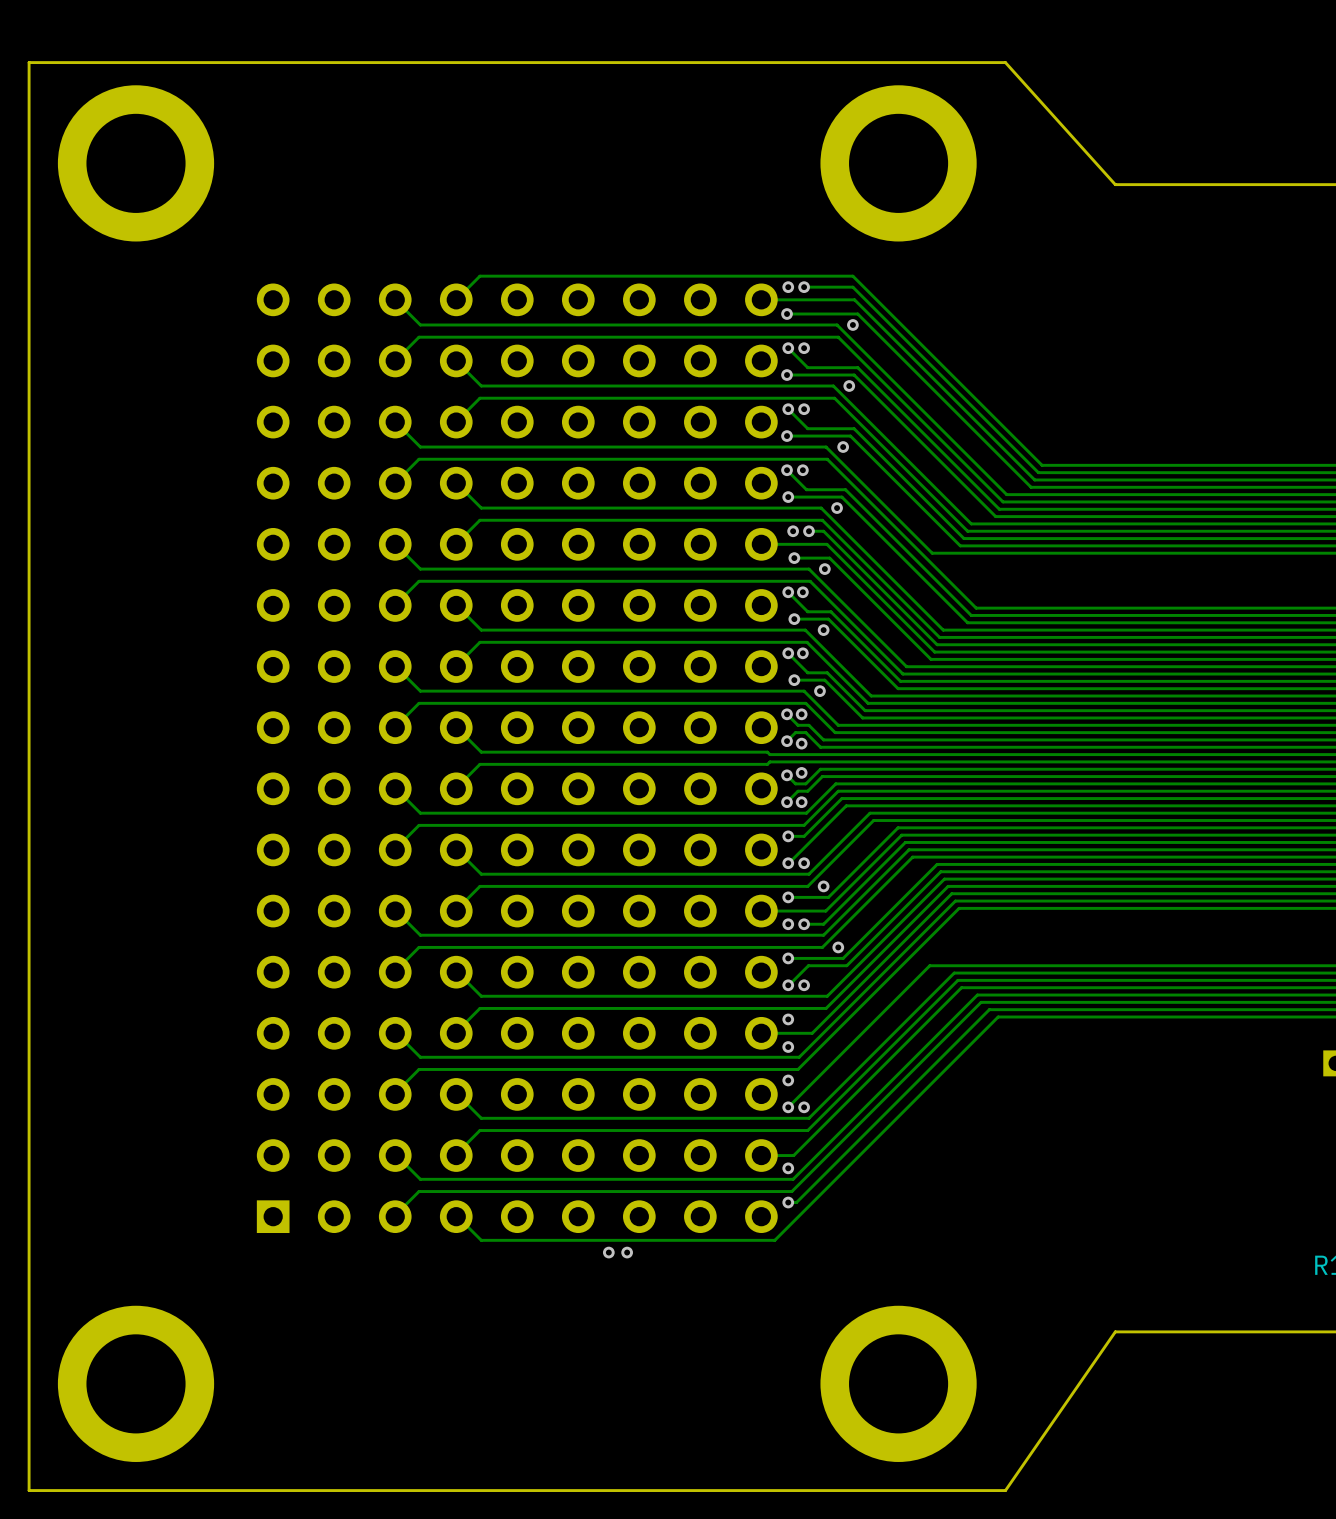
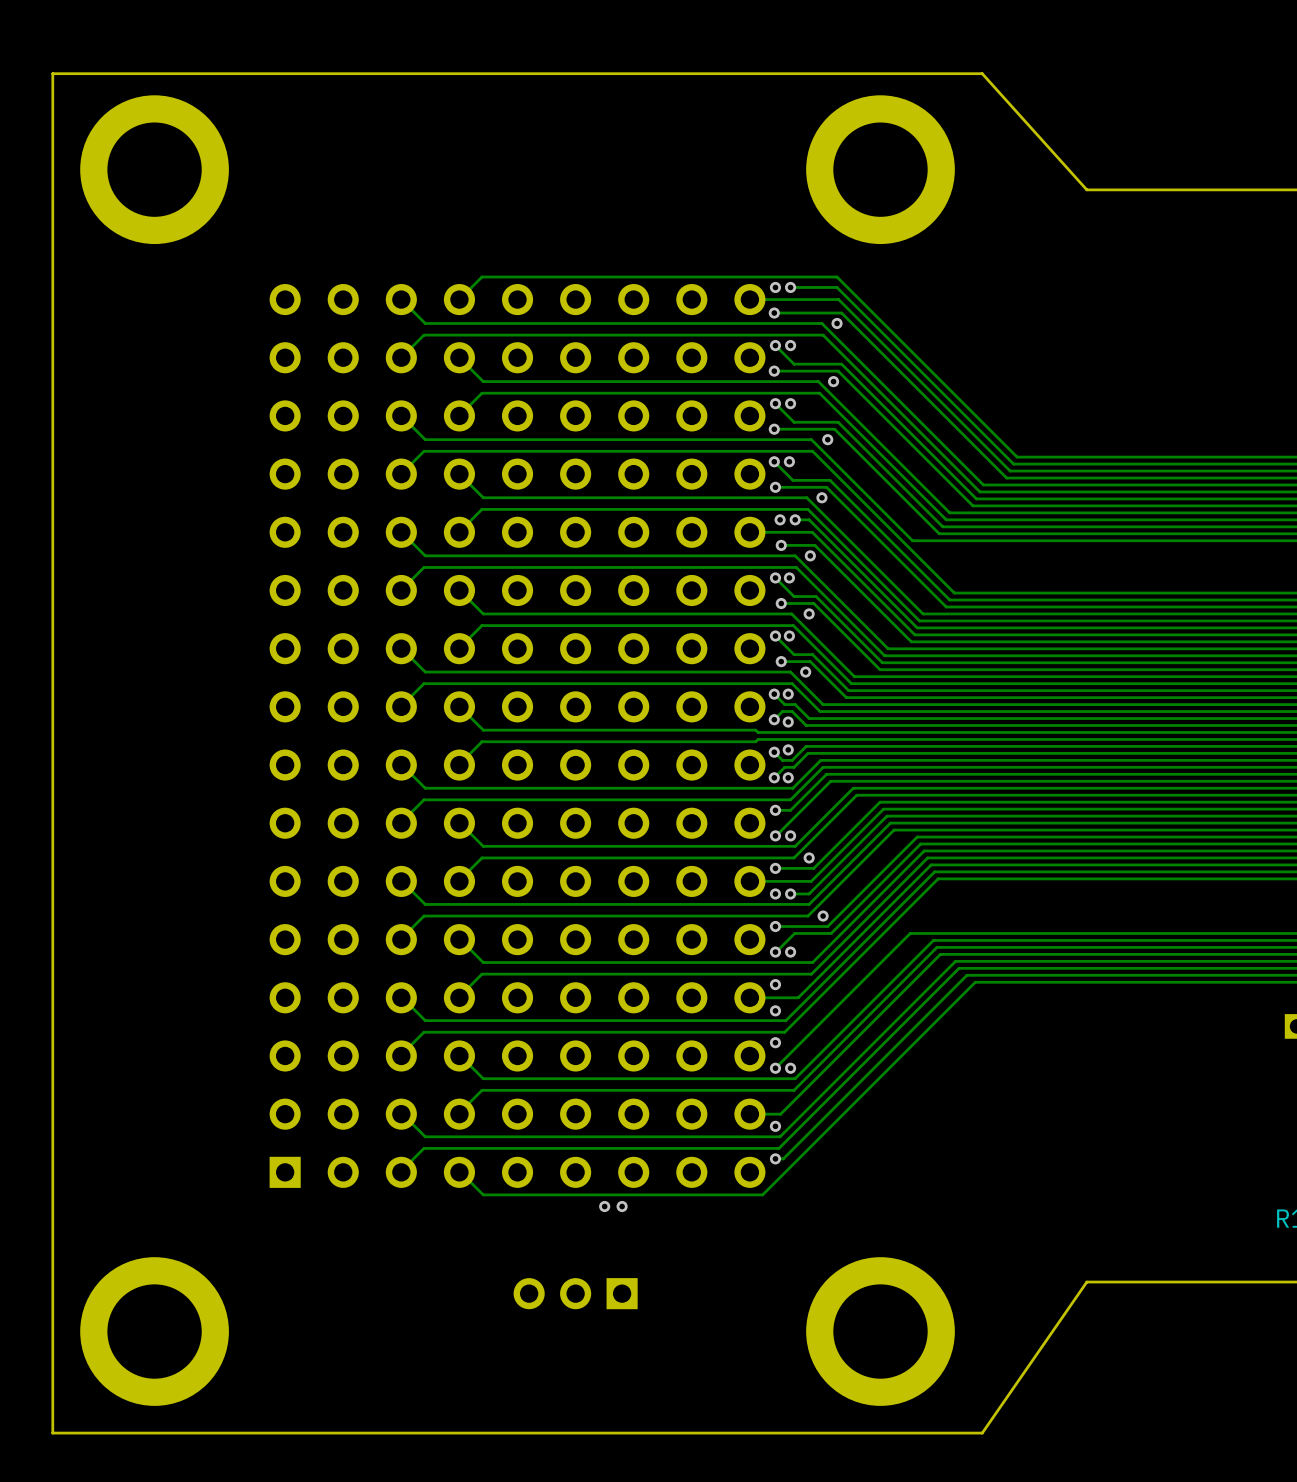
part: none -> (575, 1293)

